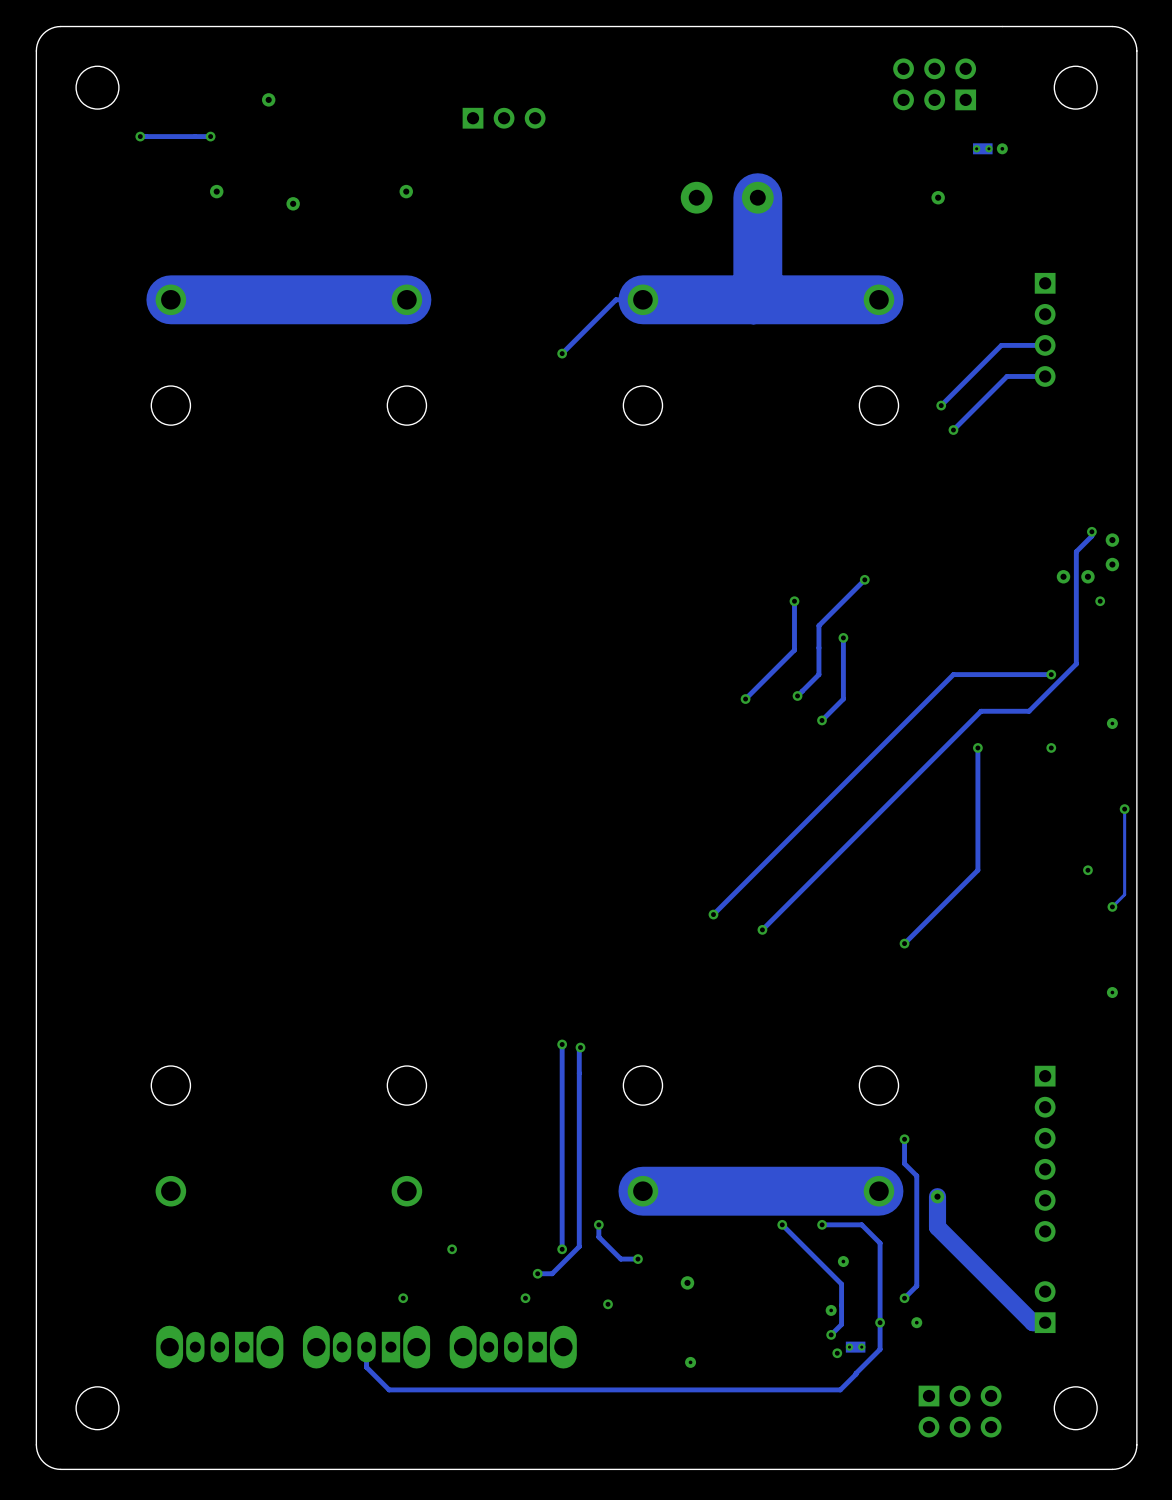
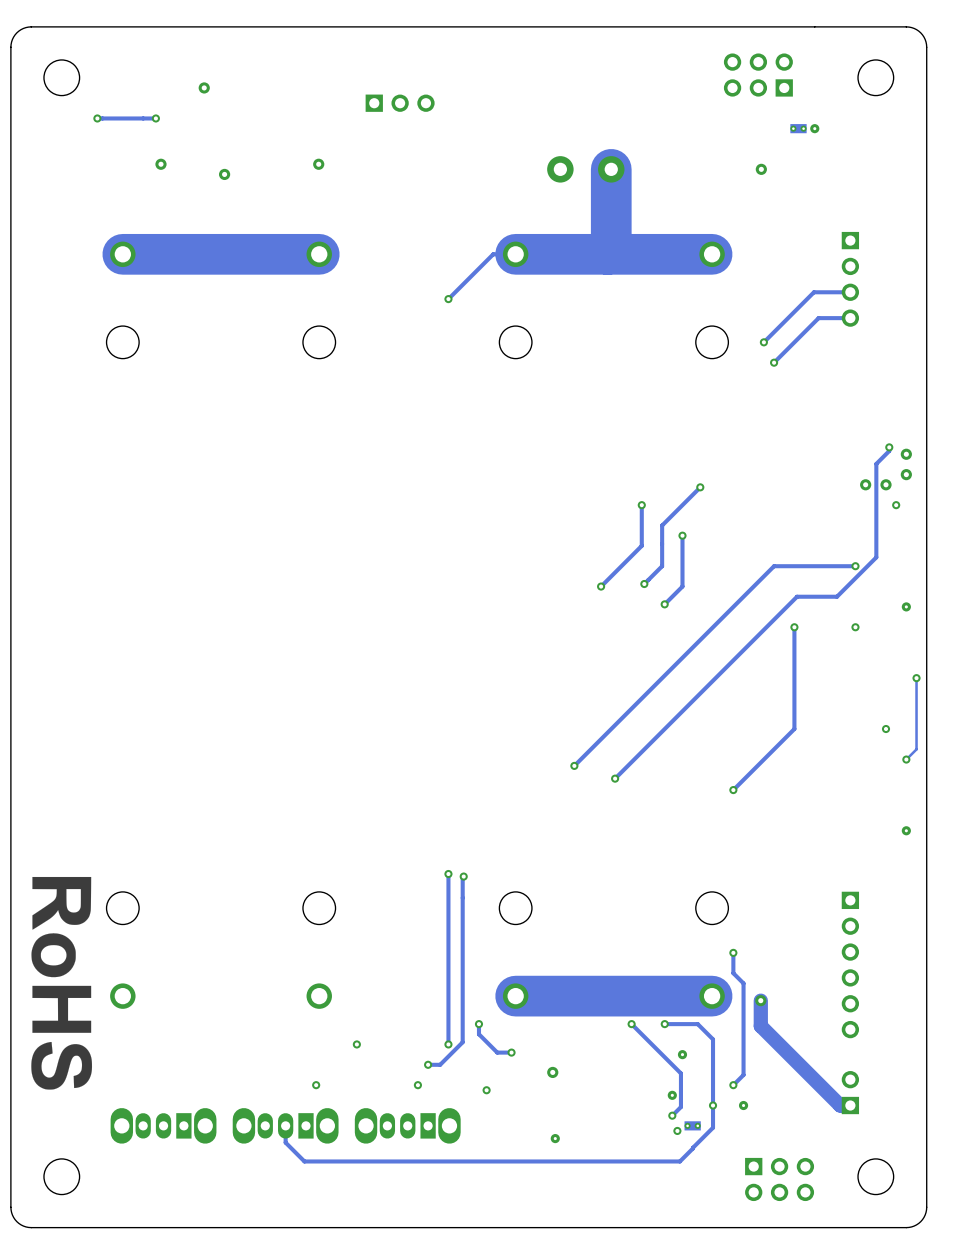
drawing: none -> [31, 876, 93, 1090]

